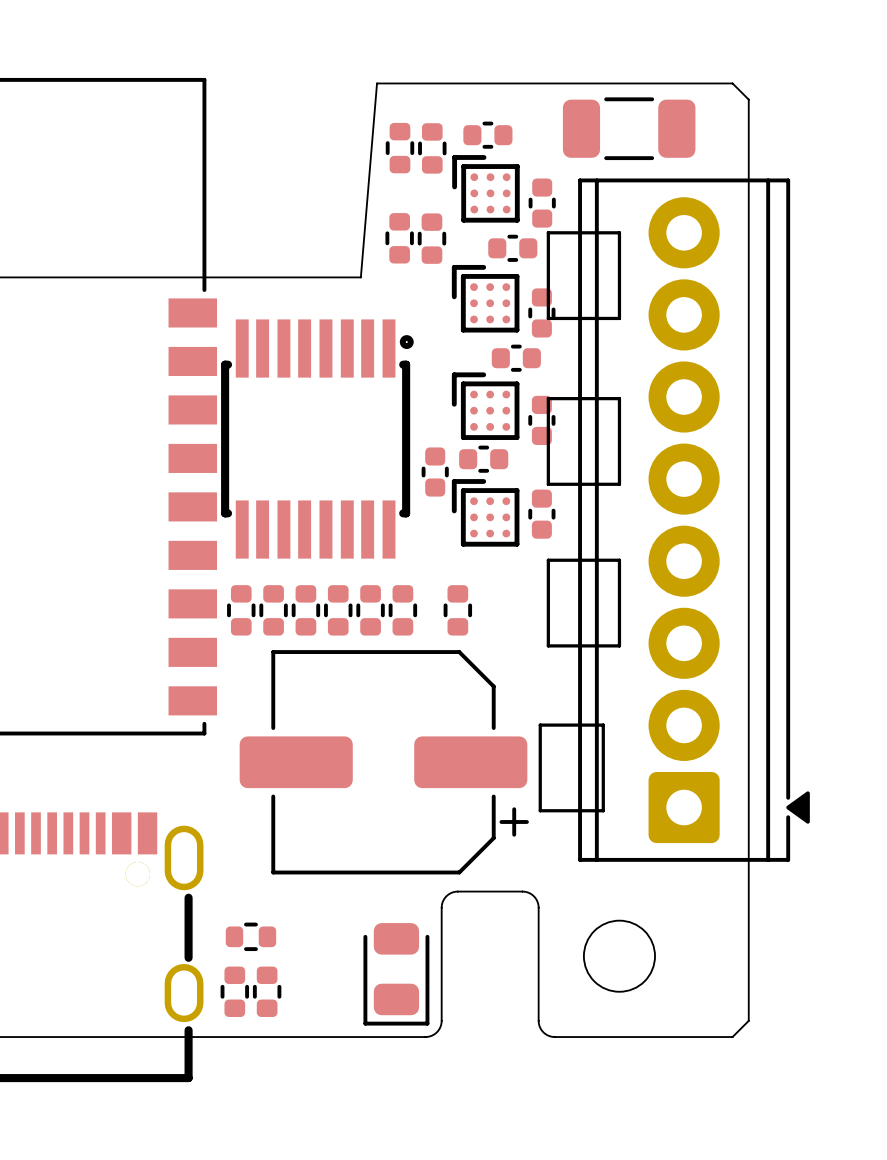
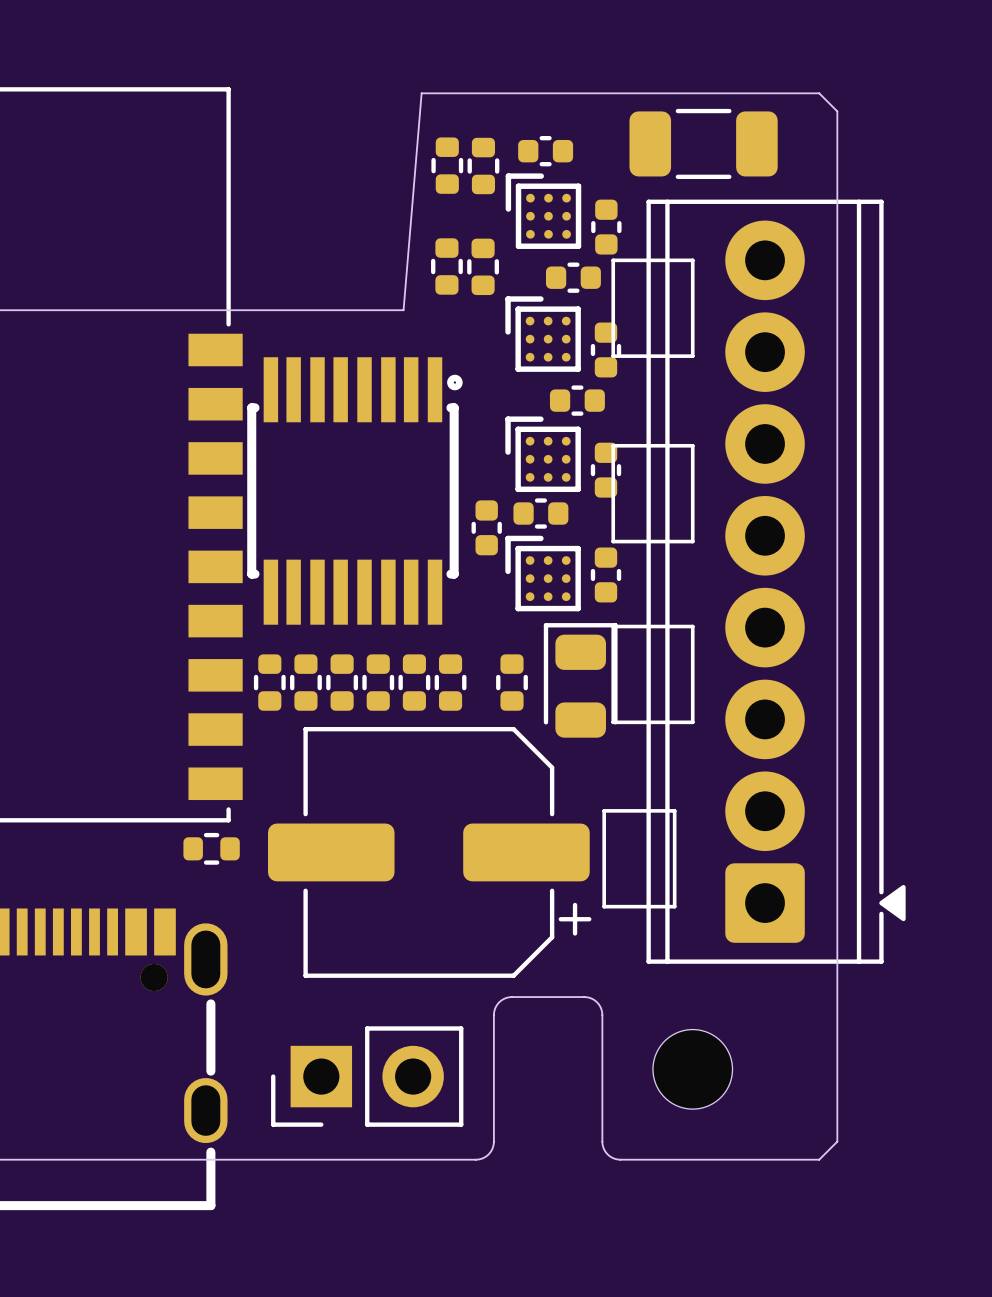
part: none -> (211, 848)
part: (250, 936) -> none
part: none -> (367, 1076)
part rotation: 0° (396, 974) -> 180° (580, 680)
part position: (396, 974) -> (580, 680)
part: (234, 991) -> none
part: (267, 991) -> none

